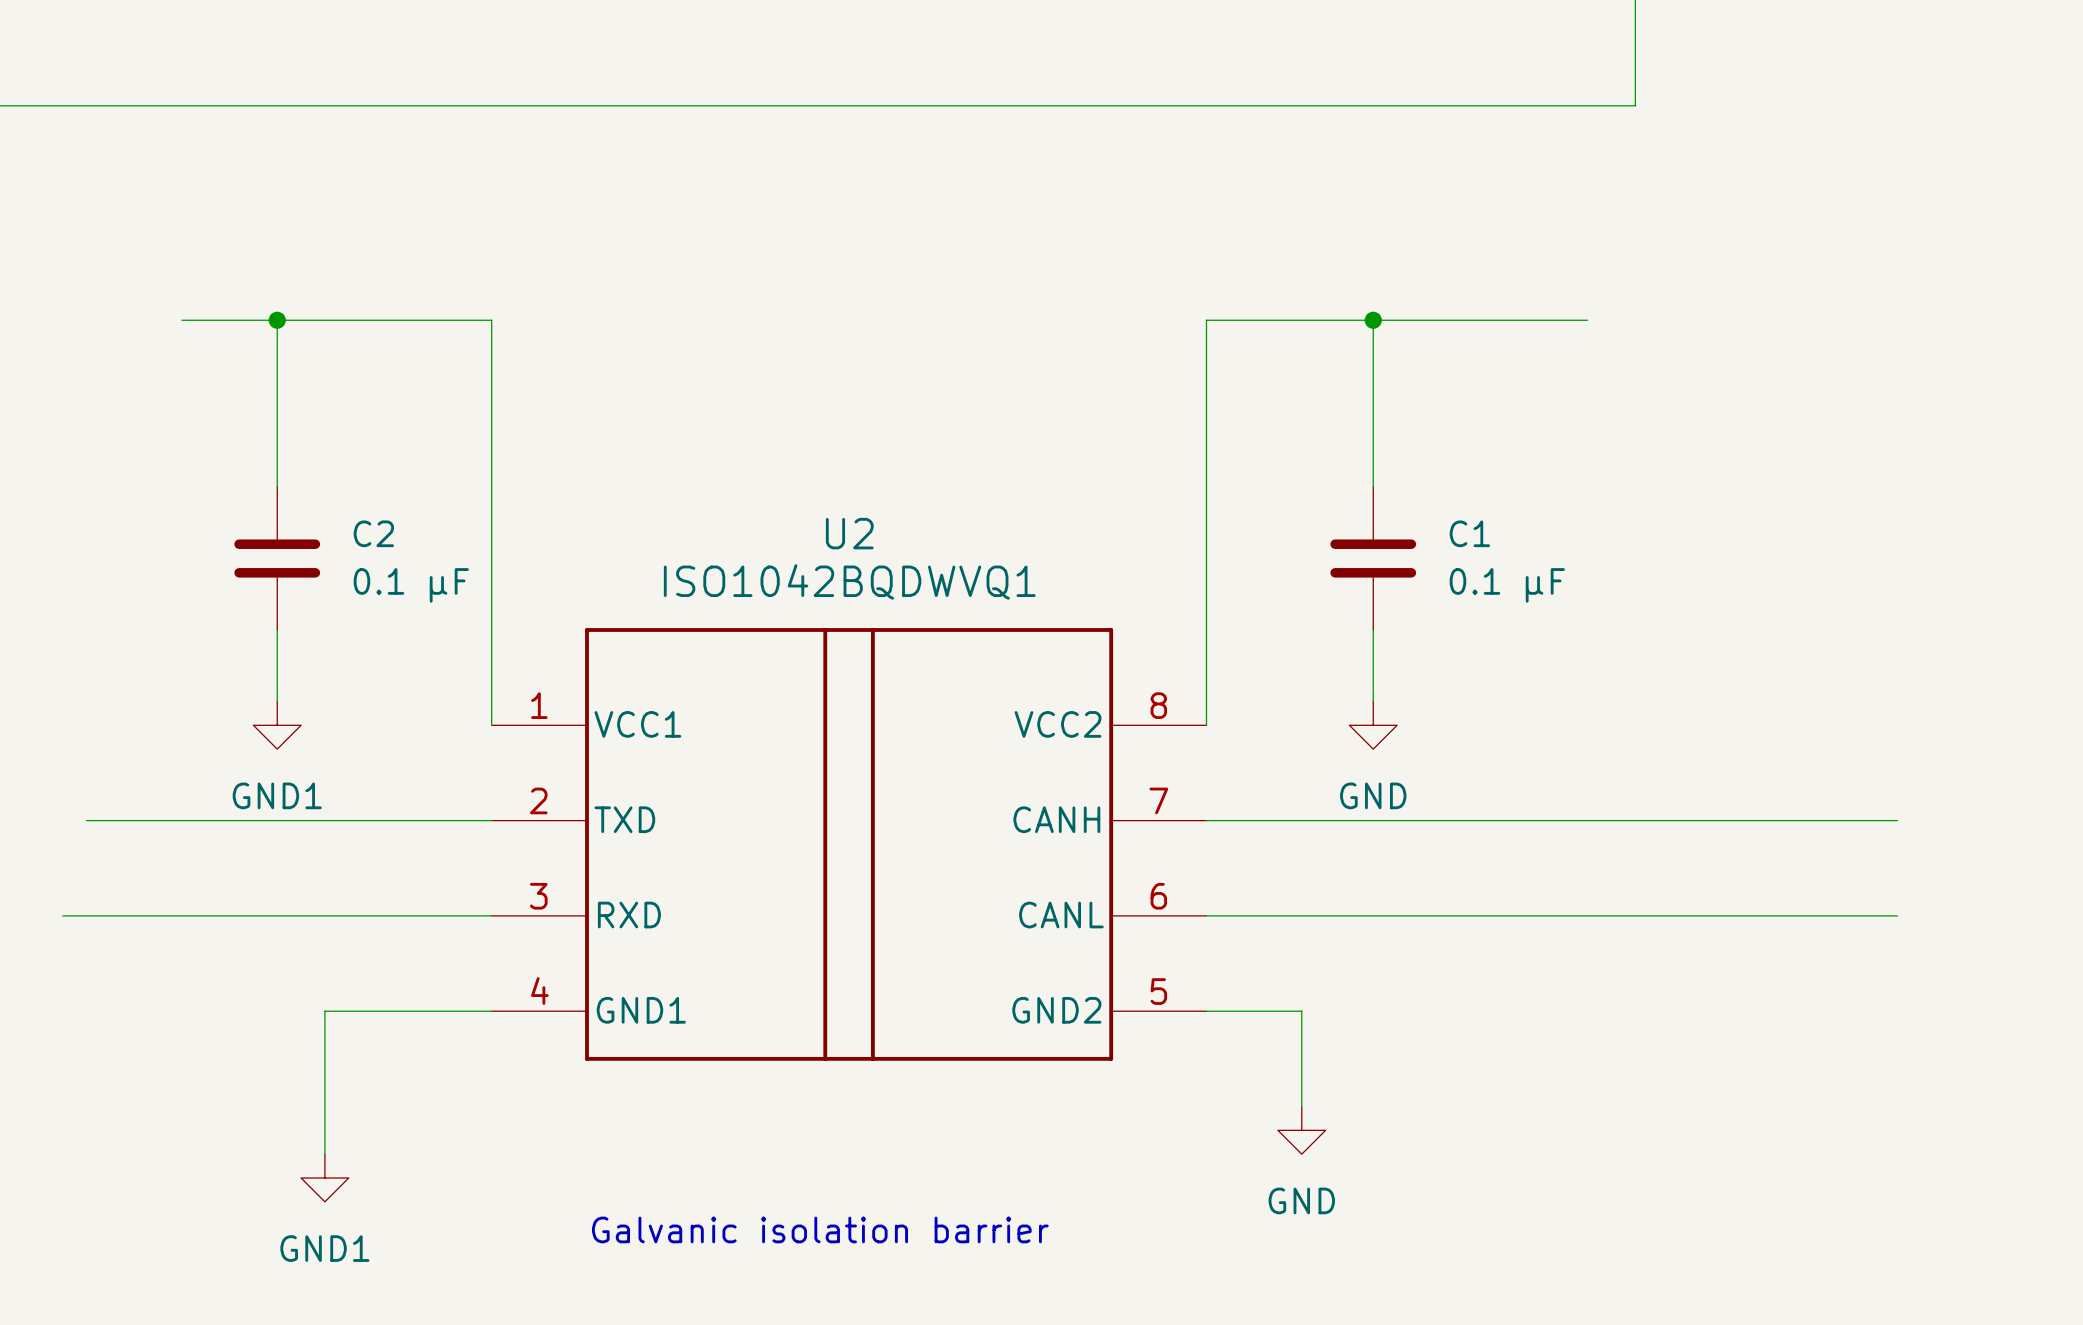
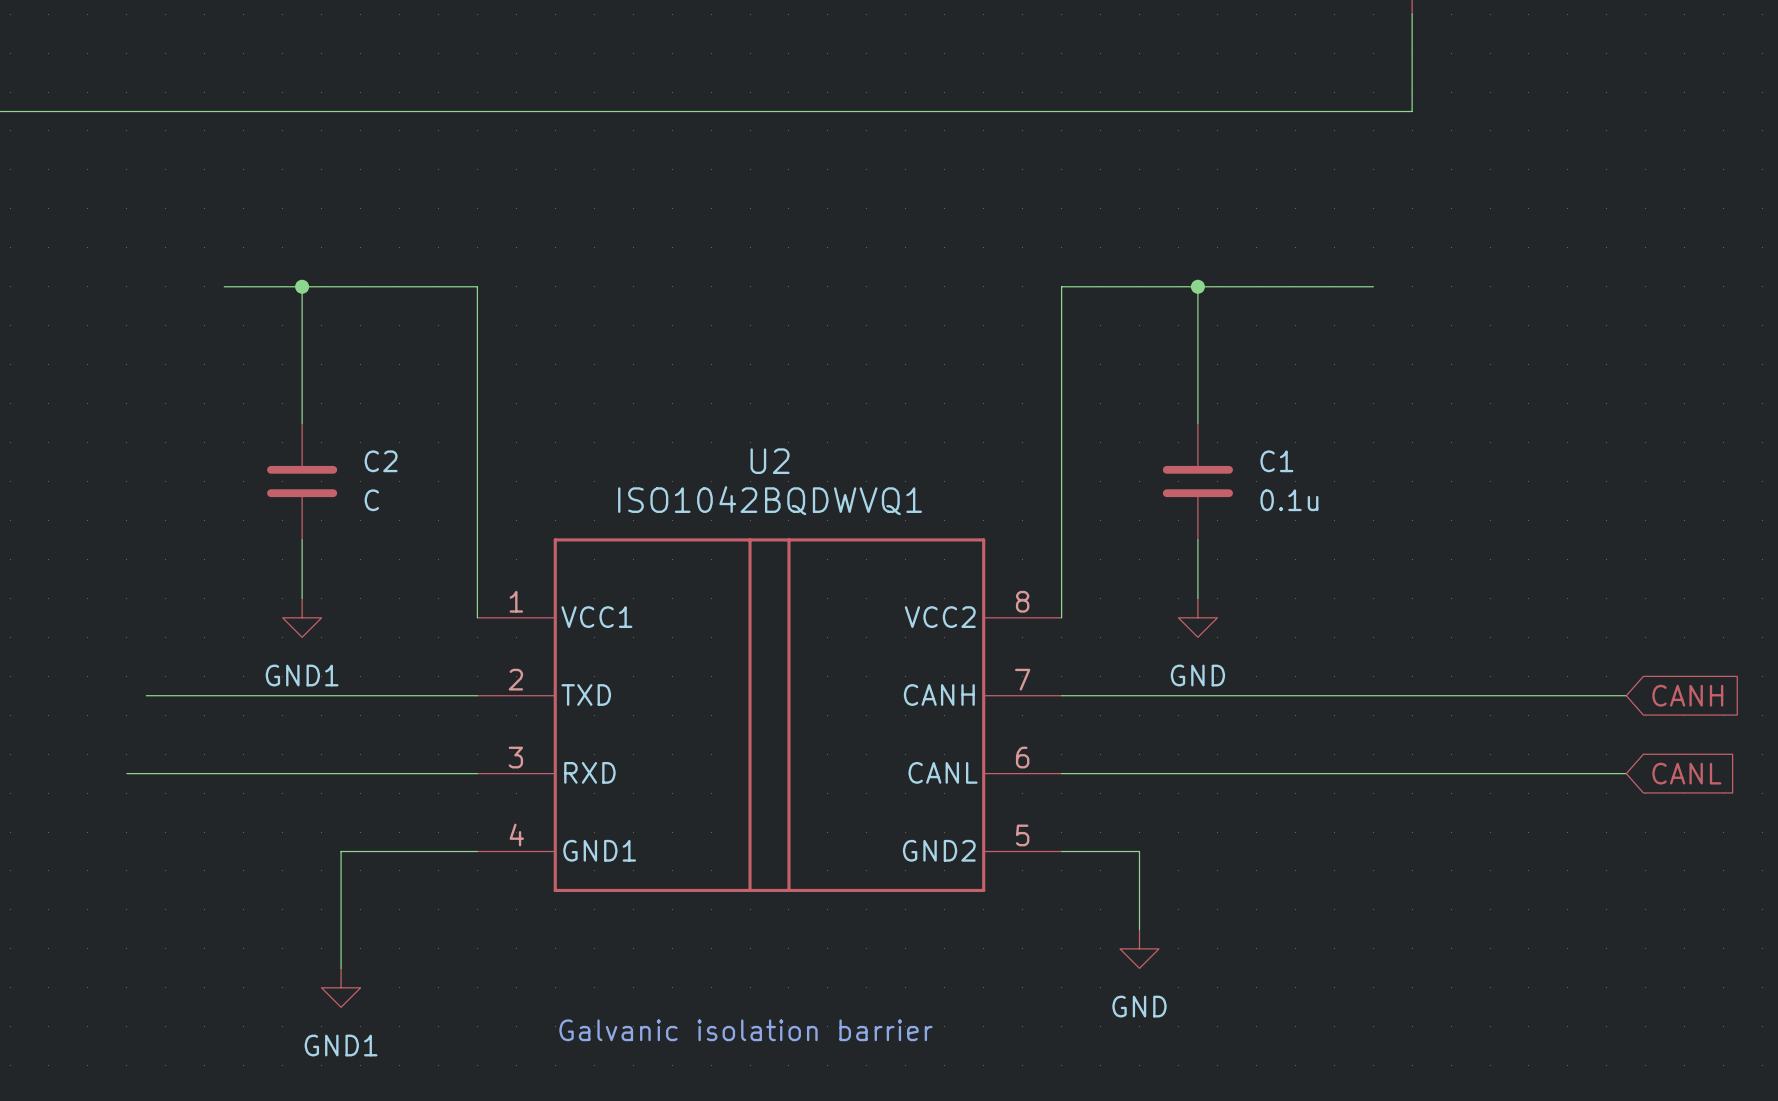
C2 value: 0.1 µF (411, 585) -> C (371, 500)
C1 value: 0.1 µF (1507, 585) -> 0.1u (1289, 500)
global label: none -> CANH (1687, 695)
global label: none -> CANL (1686, 773)

